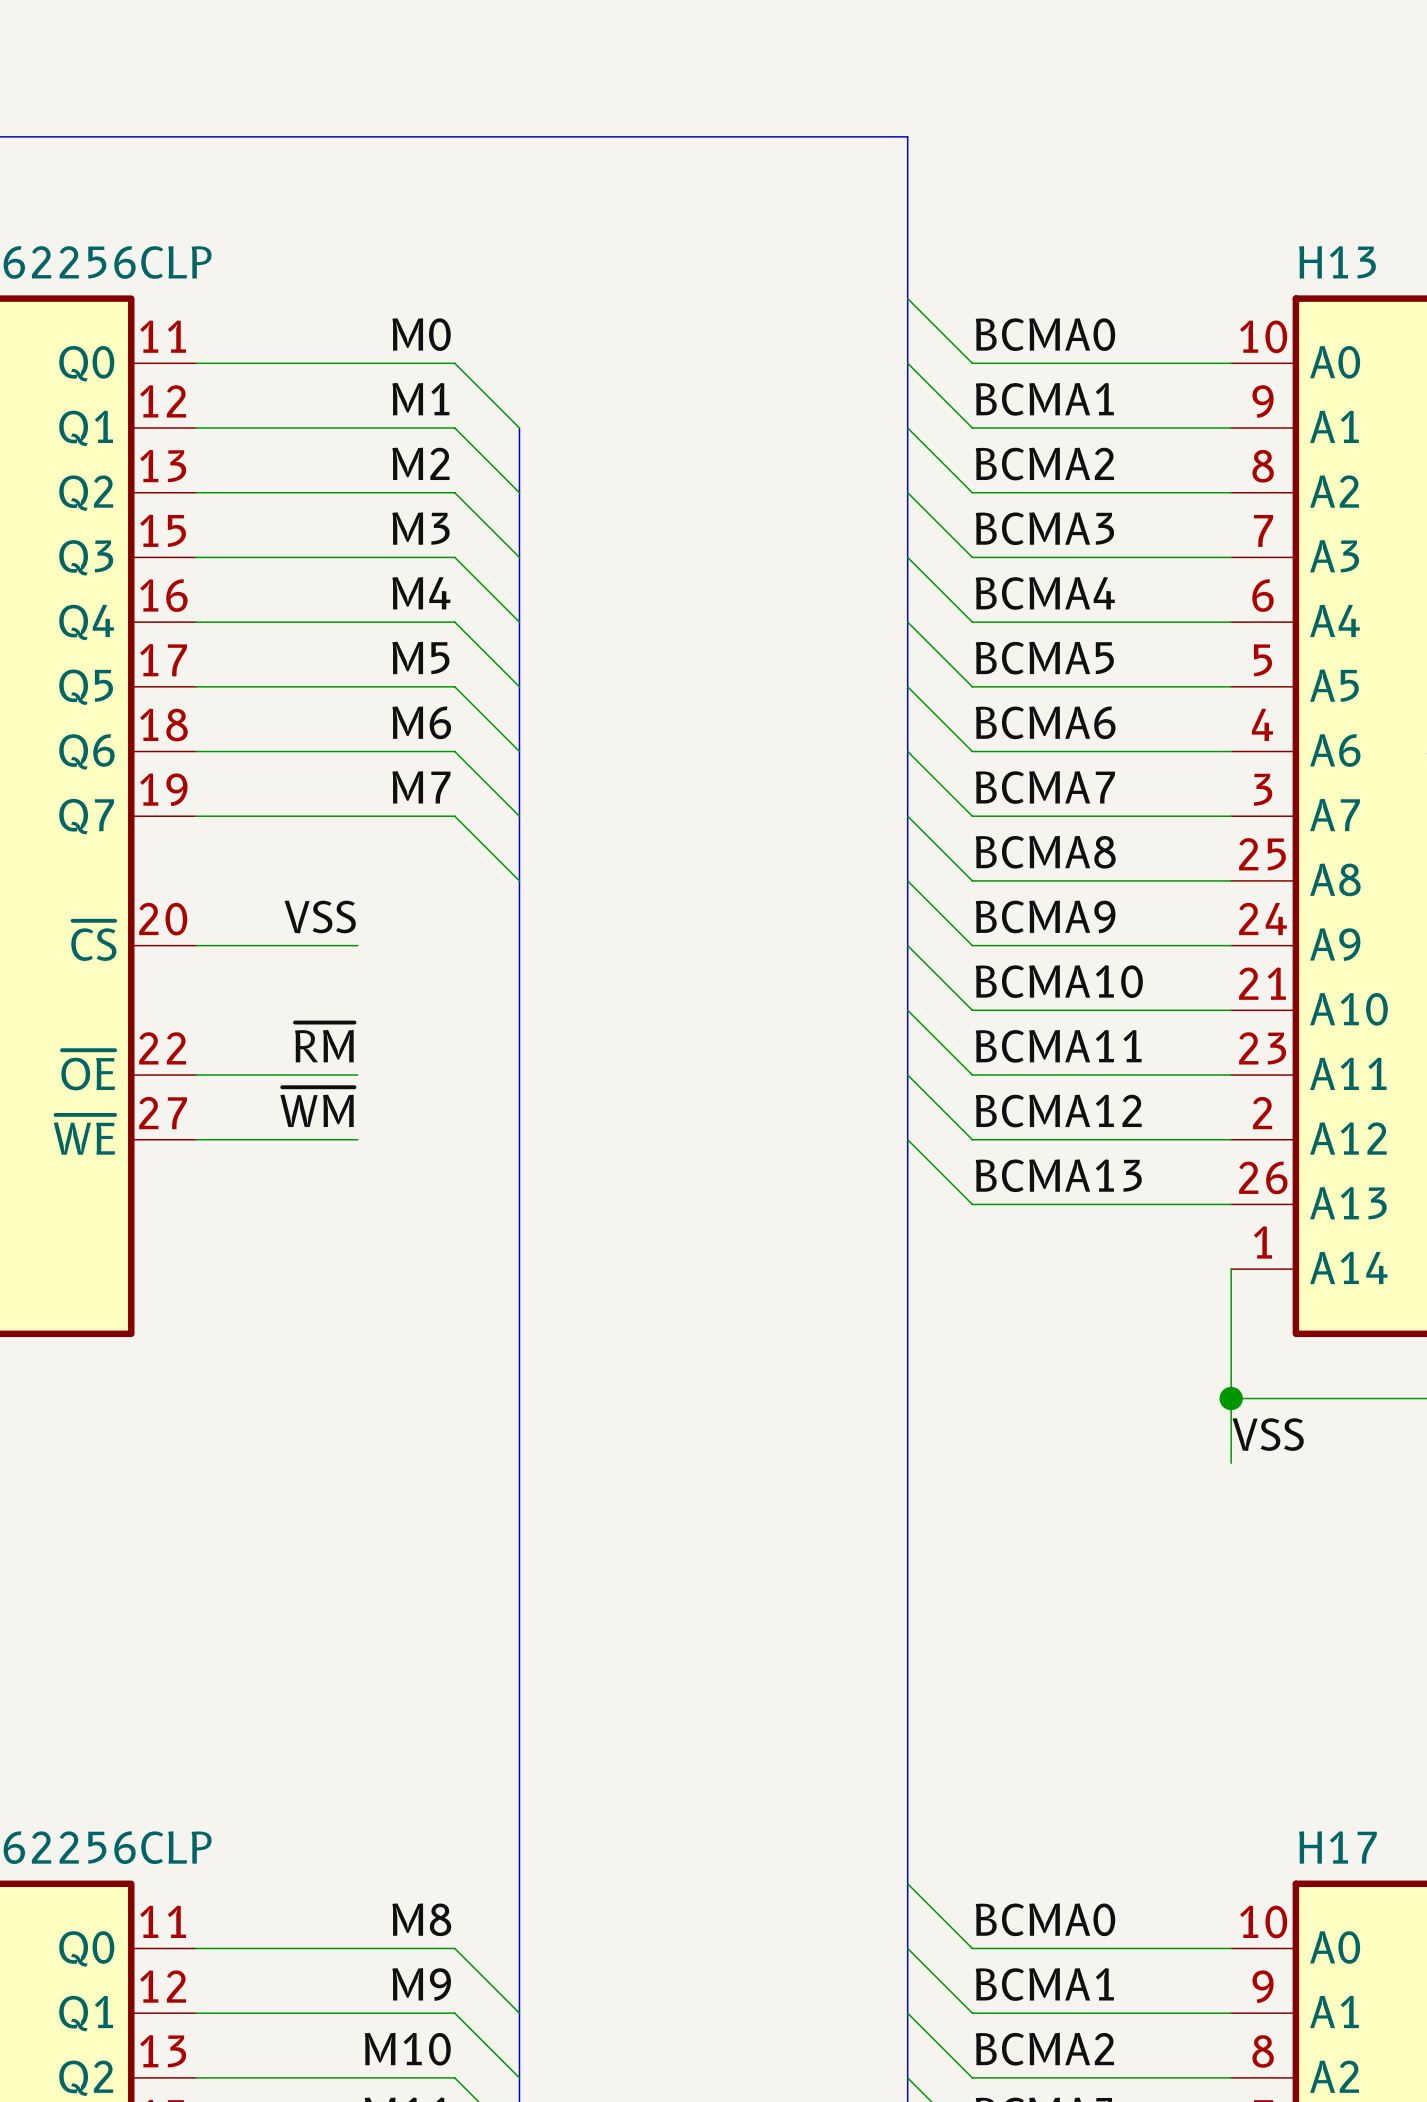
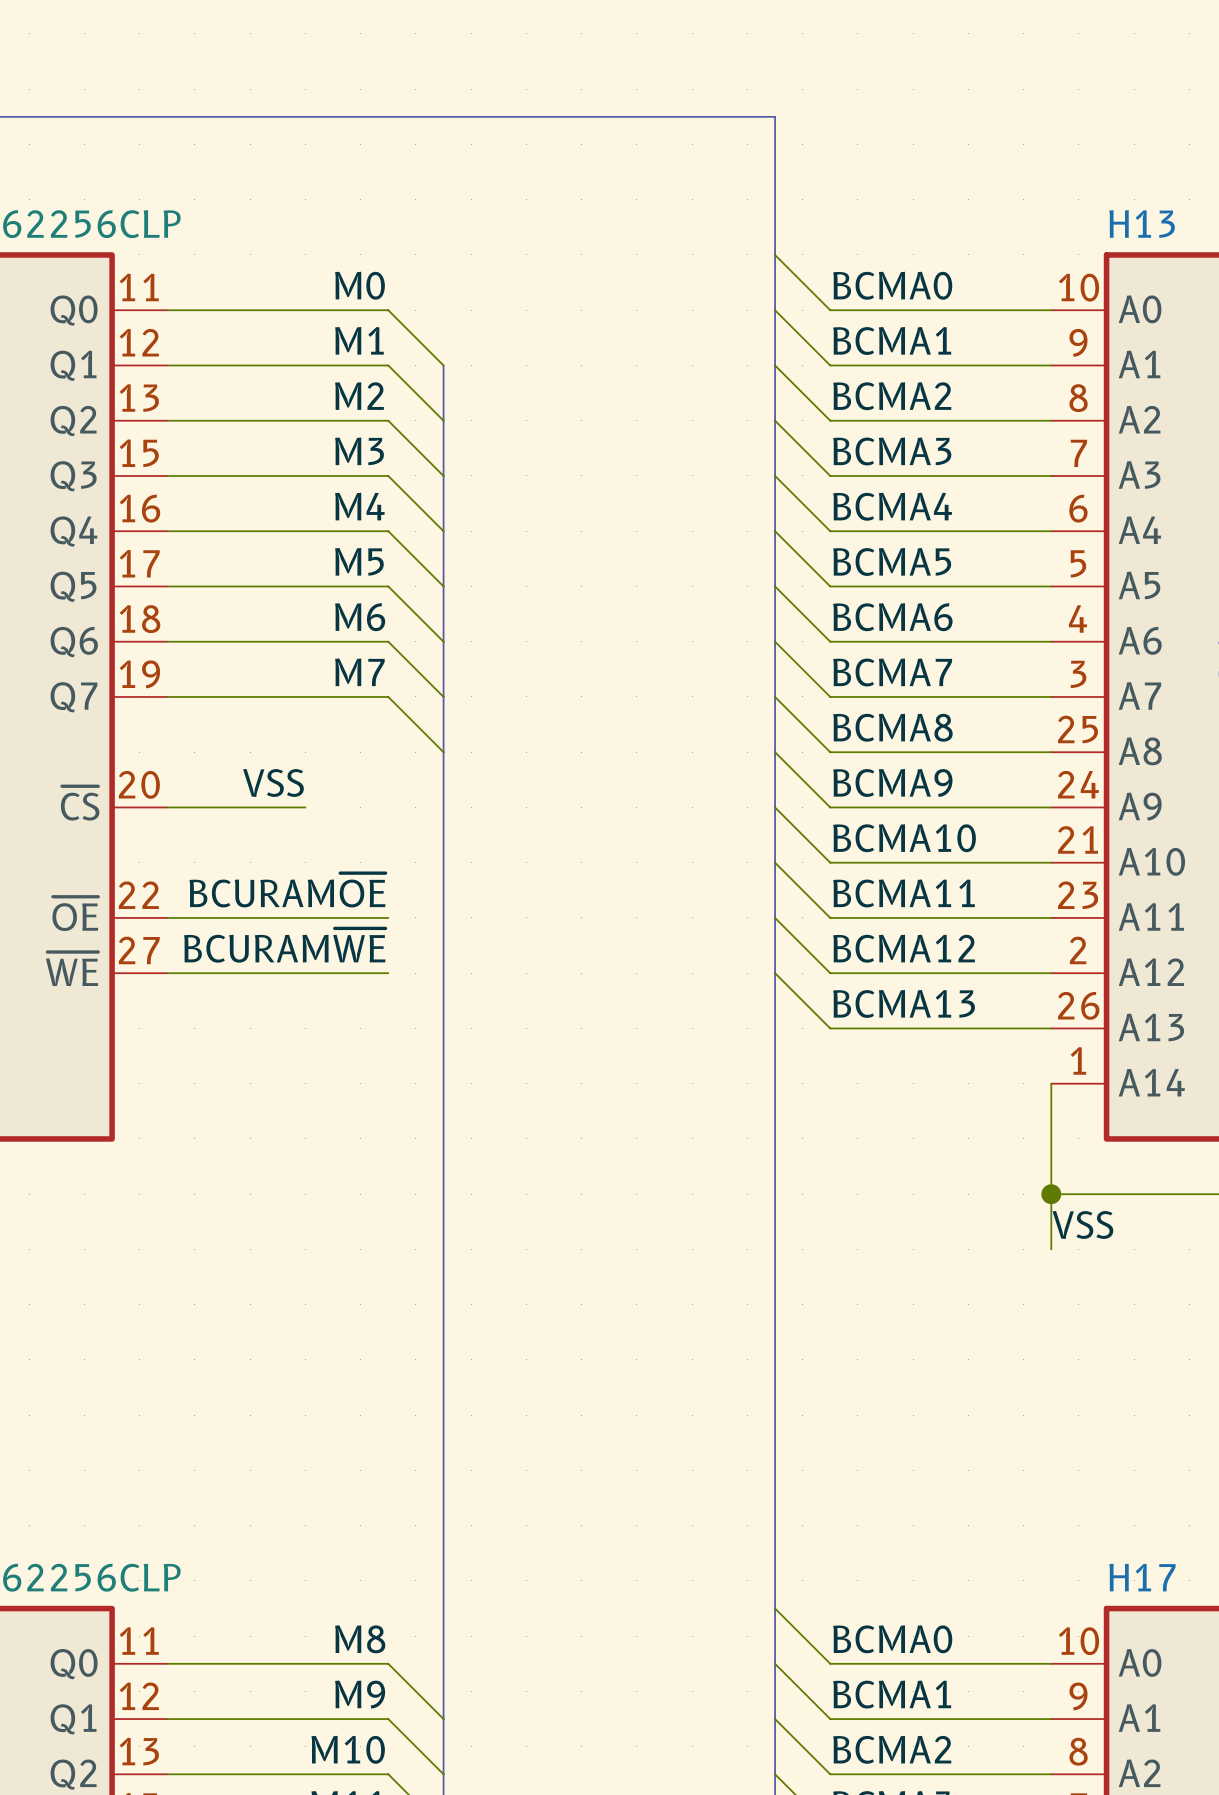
label: ~{RM} (324, 1042) -> none
label: none -> BCURAM~{OE} (287, 890)
wire: none -> (305, 917) (388, 917)
label: ~{WM} (317, 1107) -> none
label: none -> BCURAM~{WE} (284, 945)
wire: none -> (305, 973) (388, 973)

